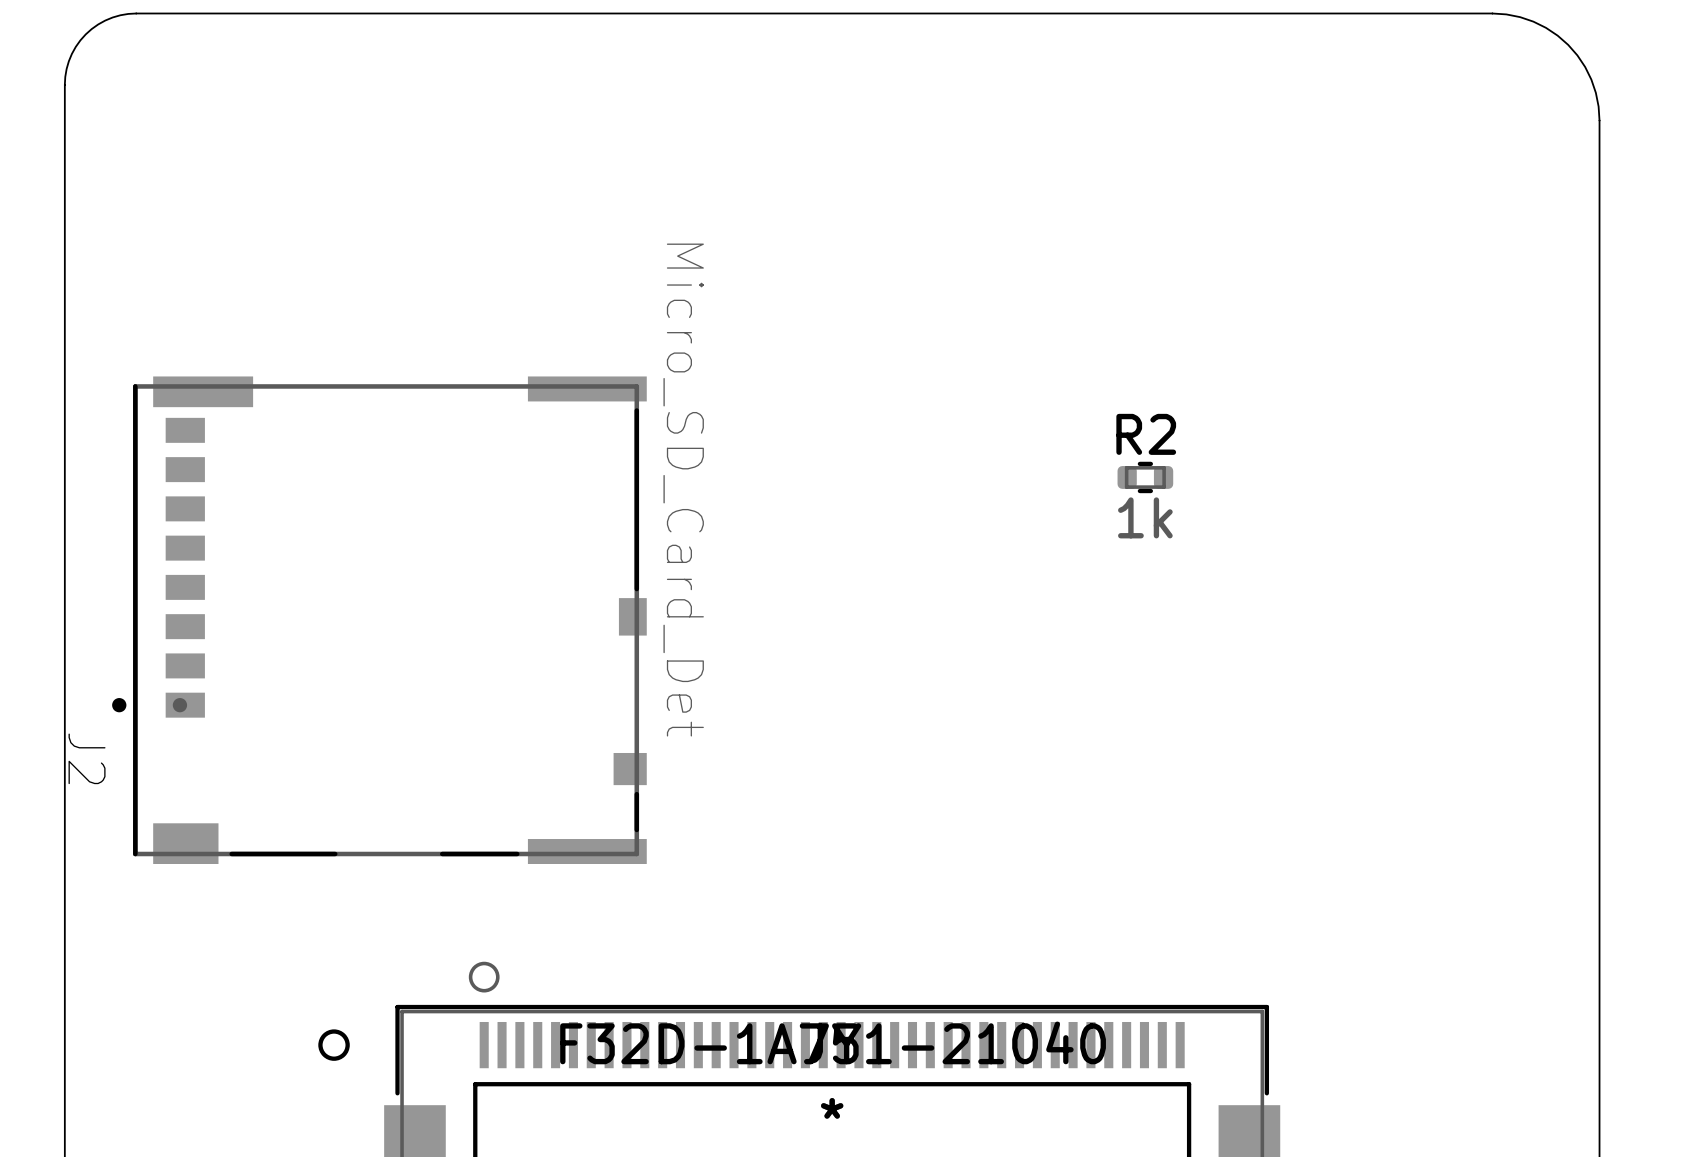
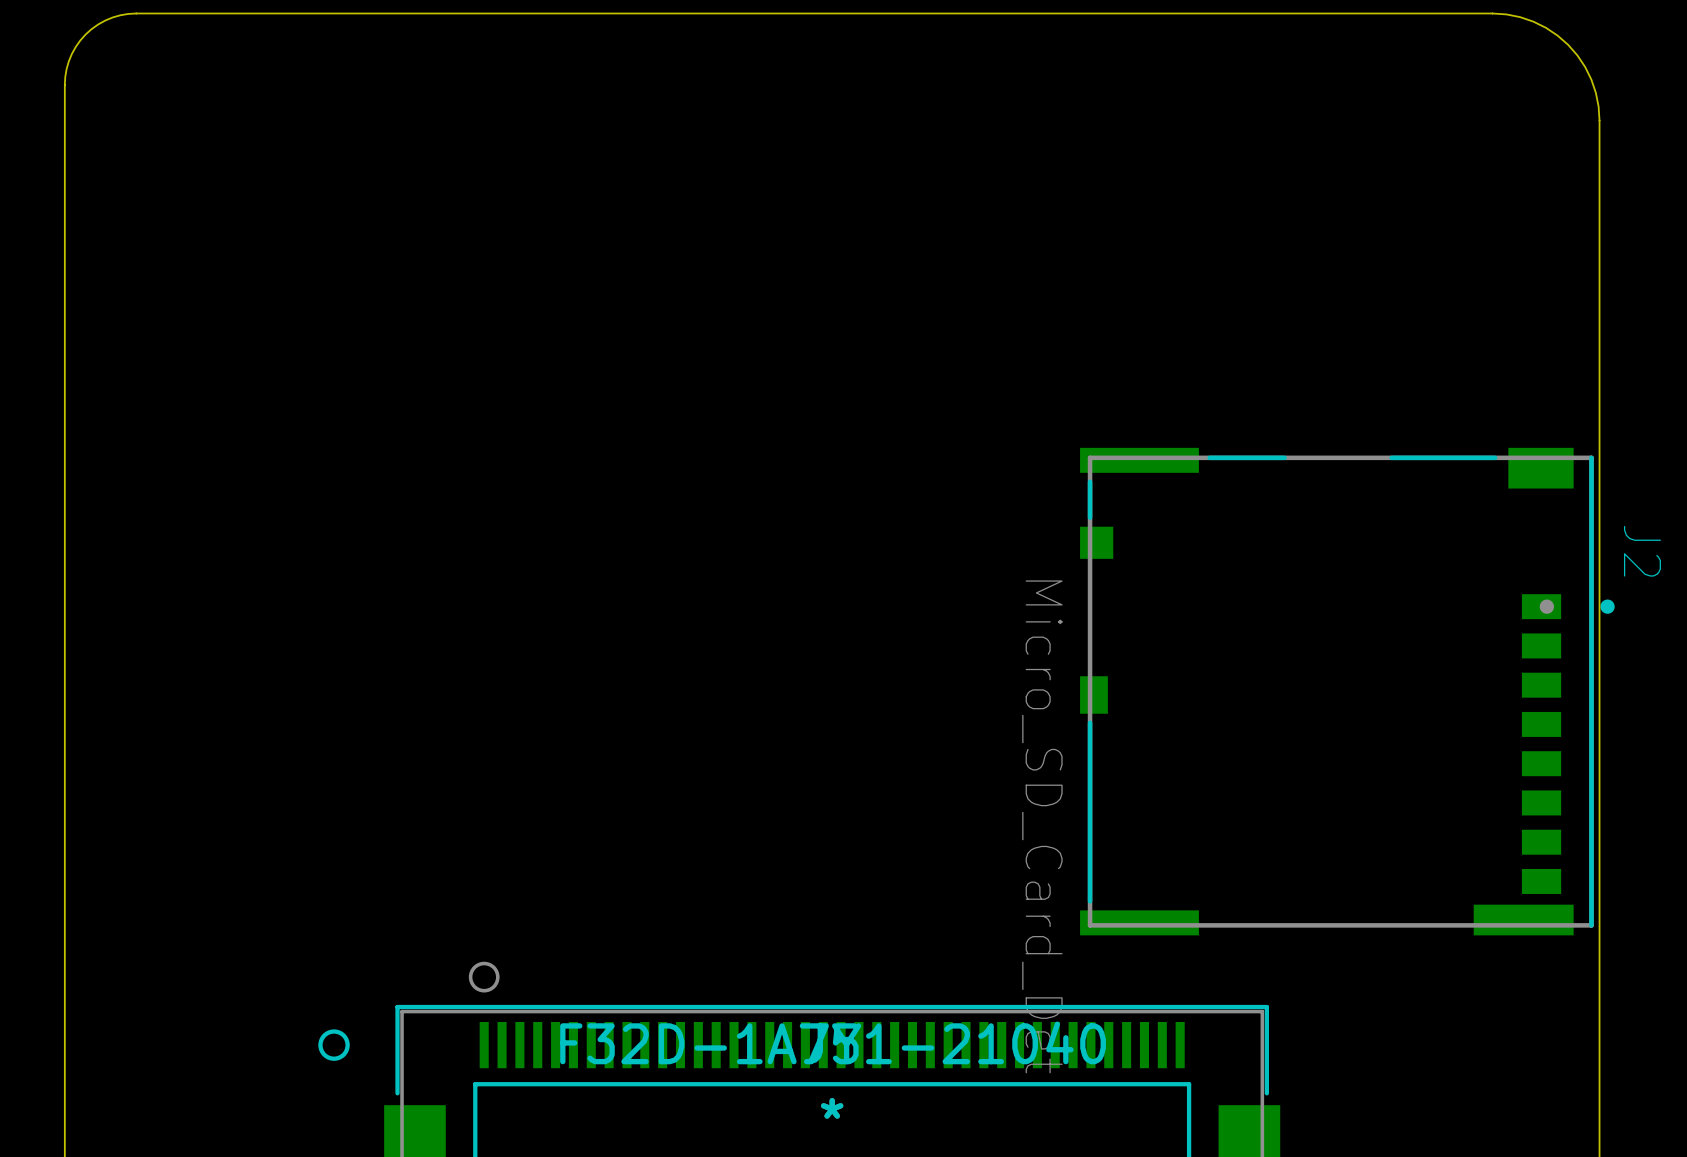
R2: 1k (1145, 477) -> none
J2 rotation: 0° (379, 620) -> 180° (1347, 691)
J2 position: (379, 620) -> (1347, 691)

